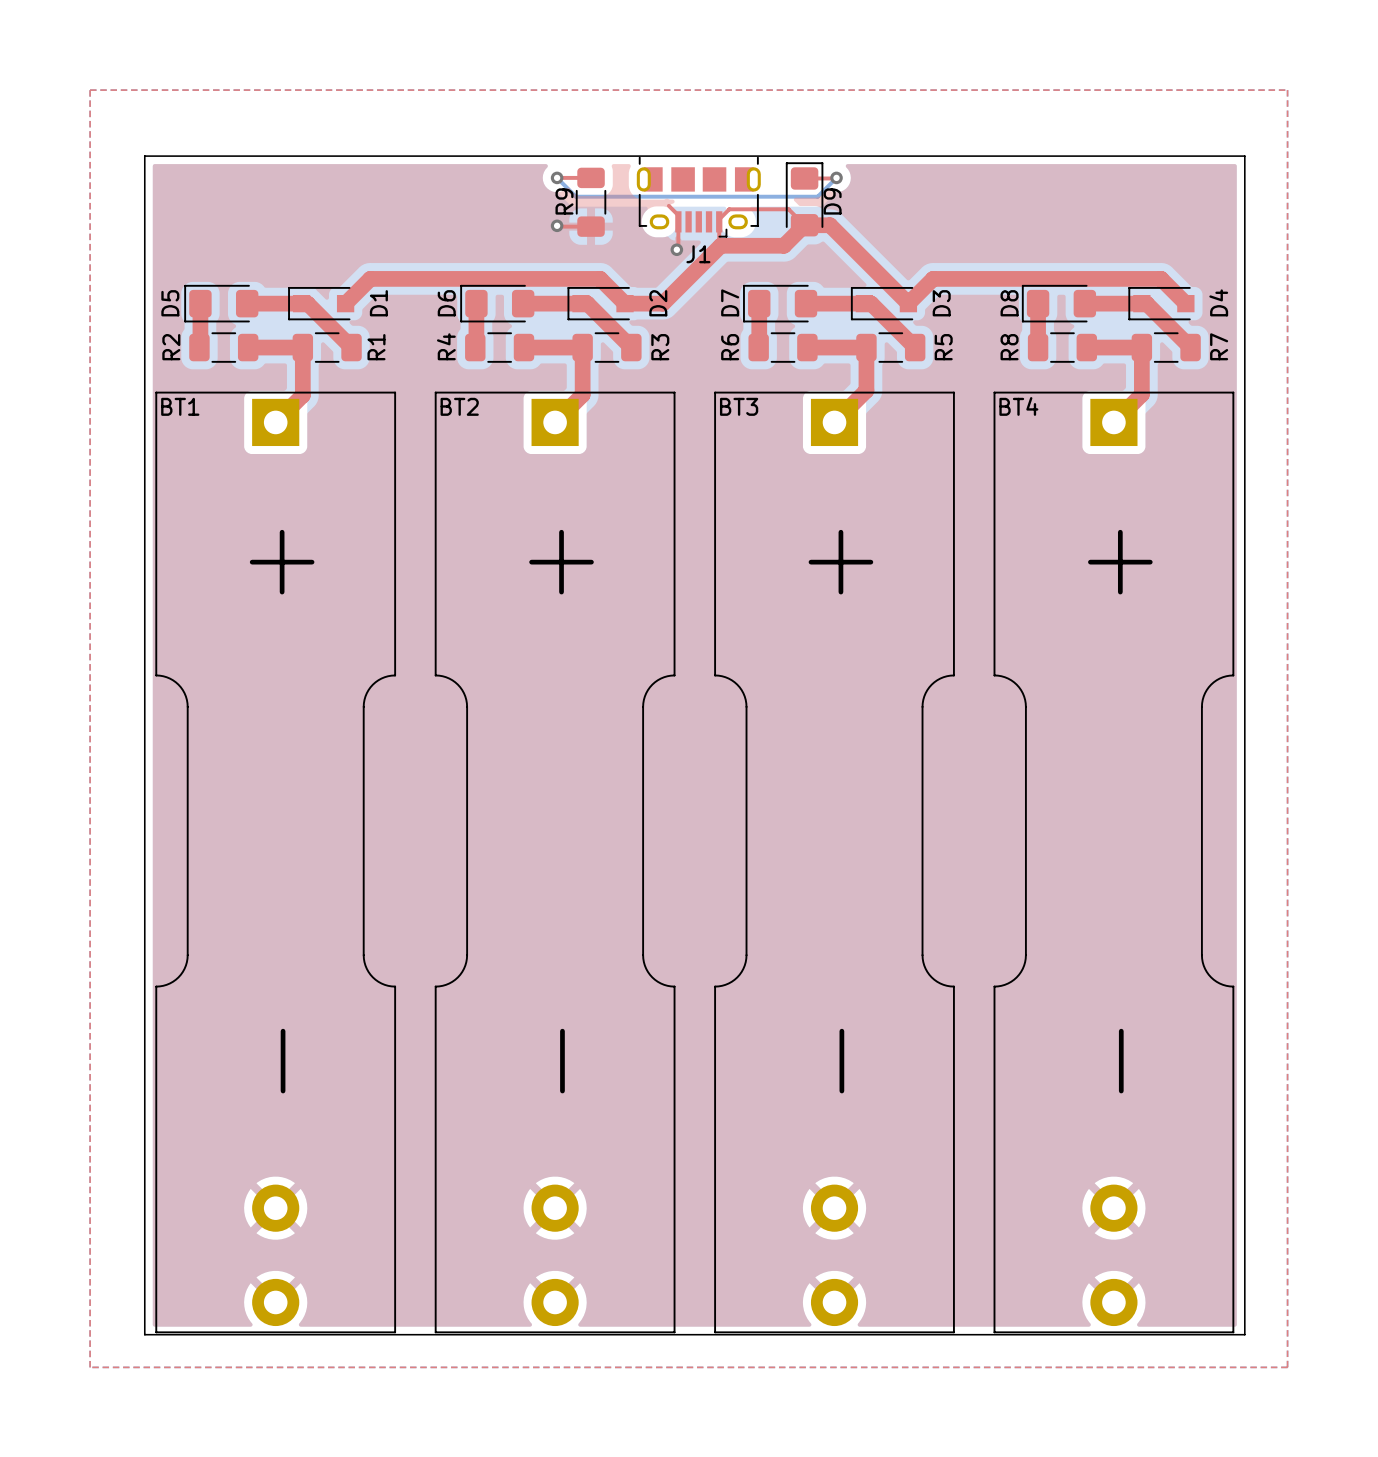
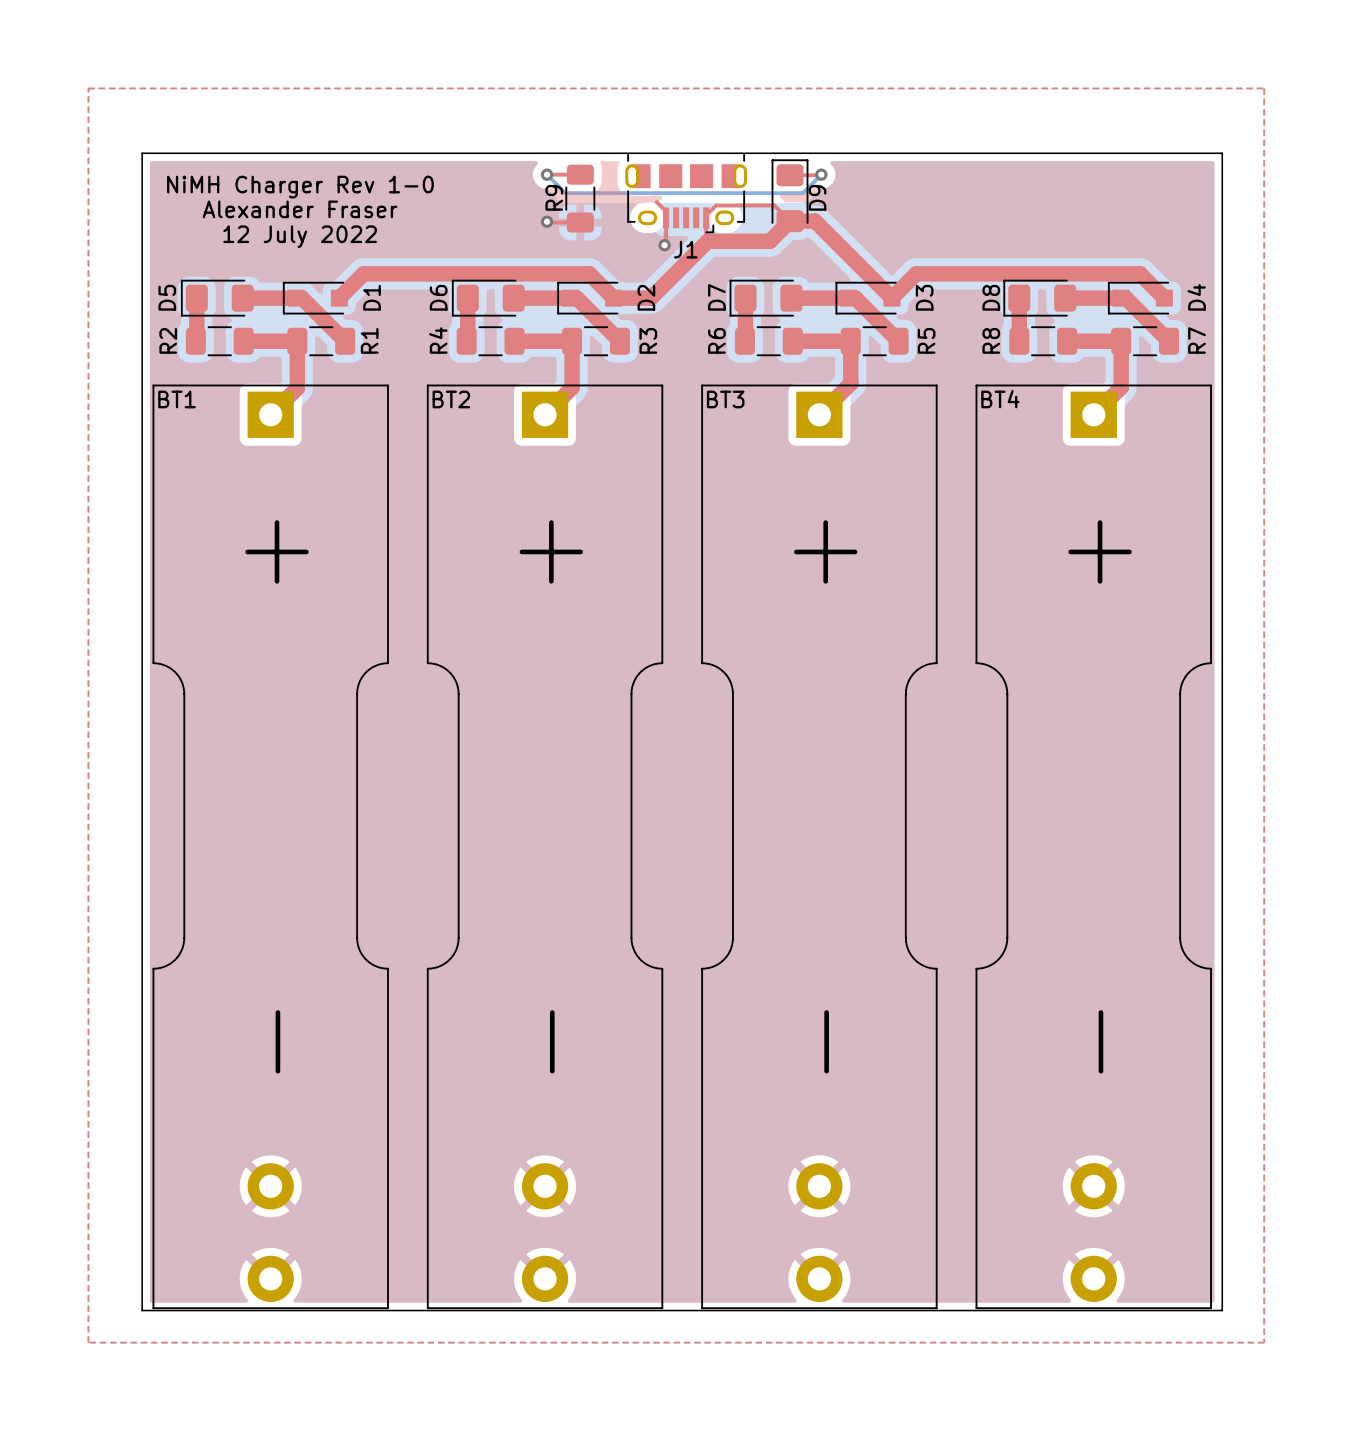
text: none -> NiMH Charger Rev 1-0 (300, 187)
text: none -> Alexander Fraser (300, 209)
text: none -> 12 July 2022 (300, 236)

